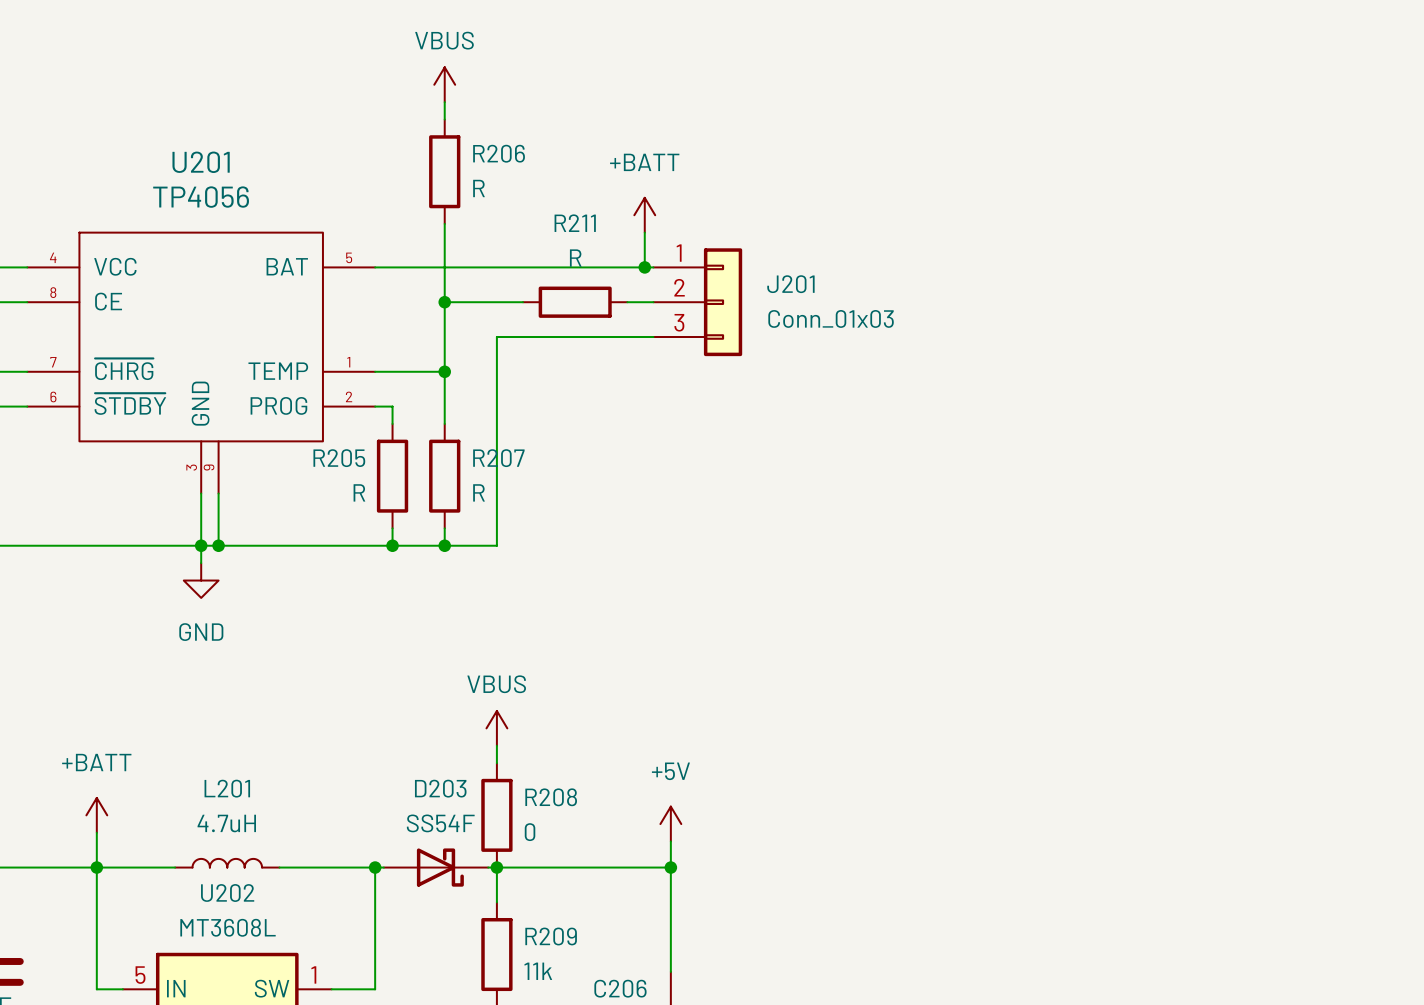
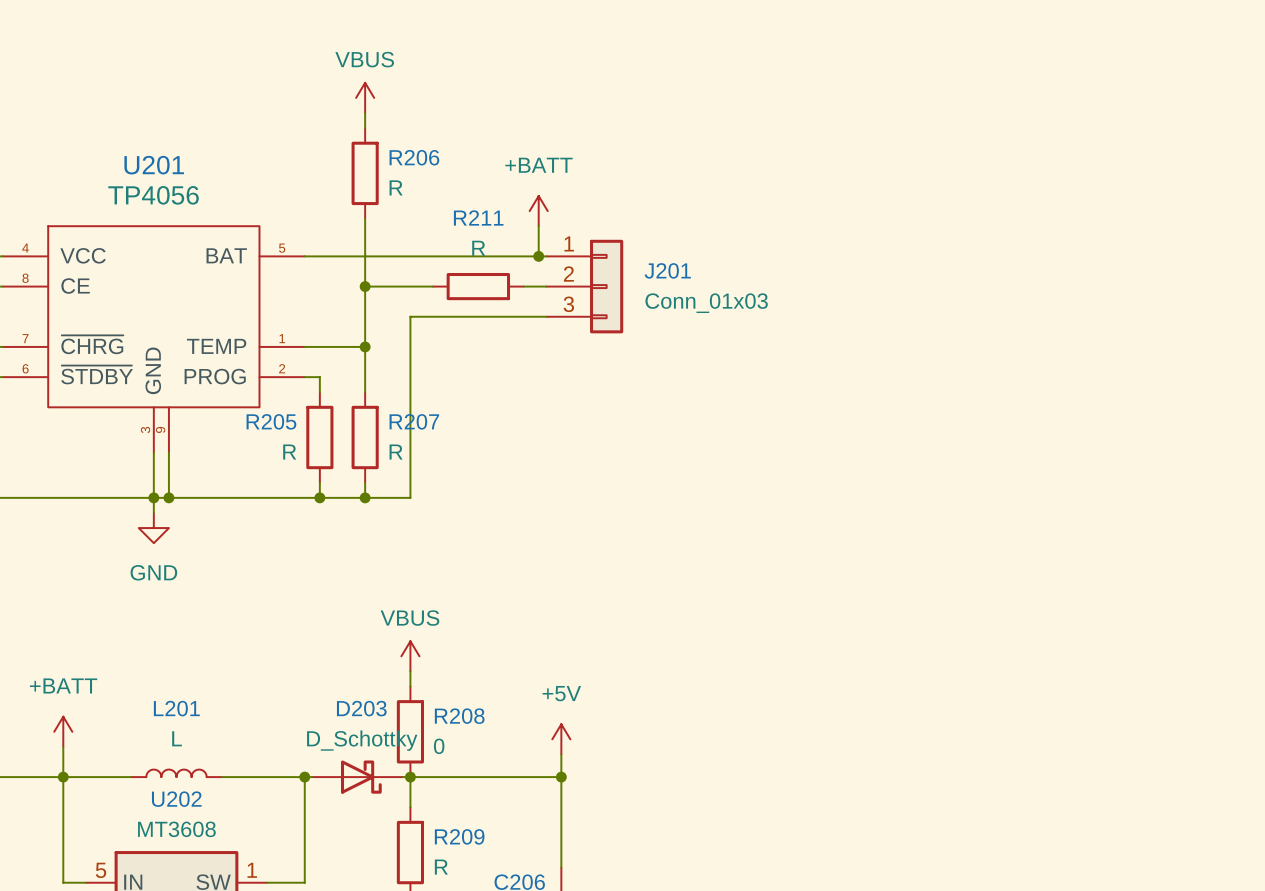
L201 value: 4.7uH (226, 823) -> L (177, 738)
D203 value: SS54F (440, 823) -> D_Schottky (362, 740)
U202 value: MT3608L (228, 927) -> MT3608 (176, 829)
R209 value: 11k (538, 971) -> R (441, 867)

